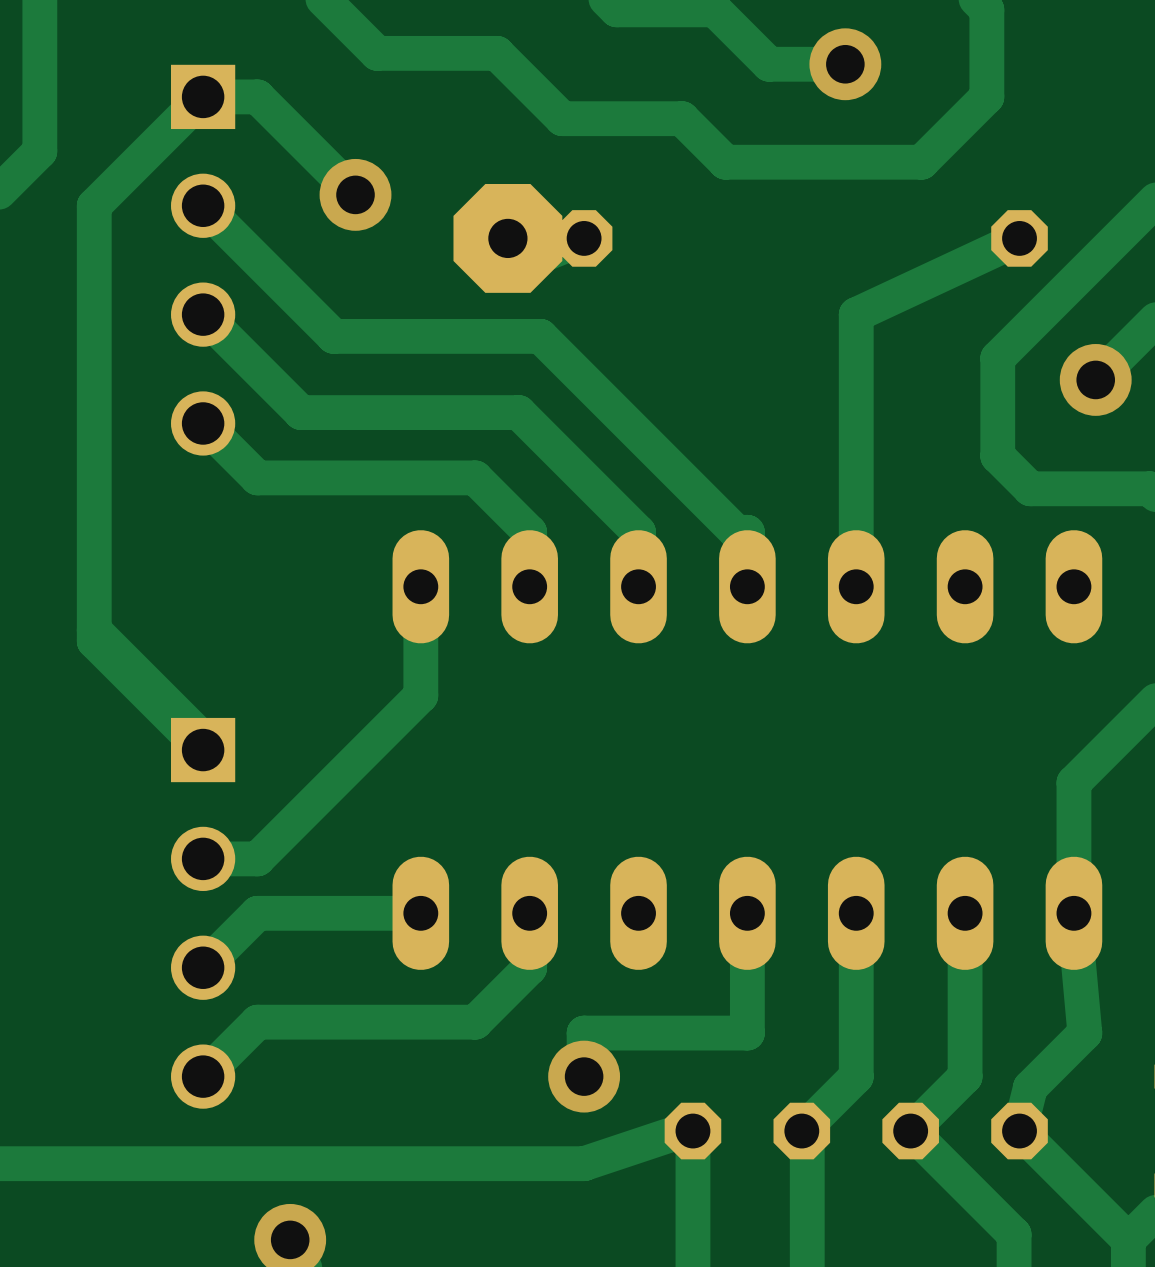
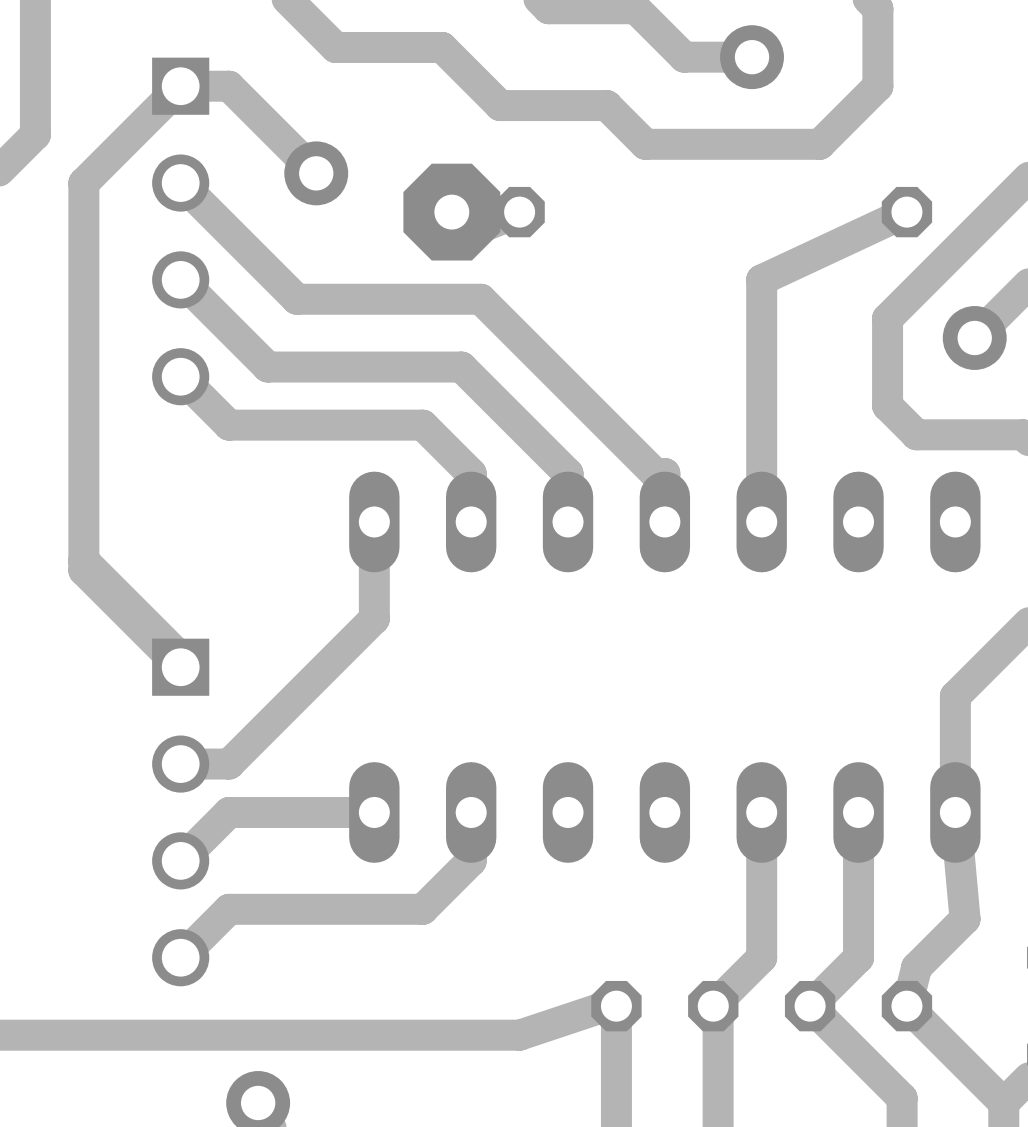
track: (747, 913) (747, 1033) (584, 1033) (584, 1076) -> none
via: (584, 1076) -> none

